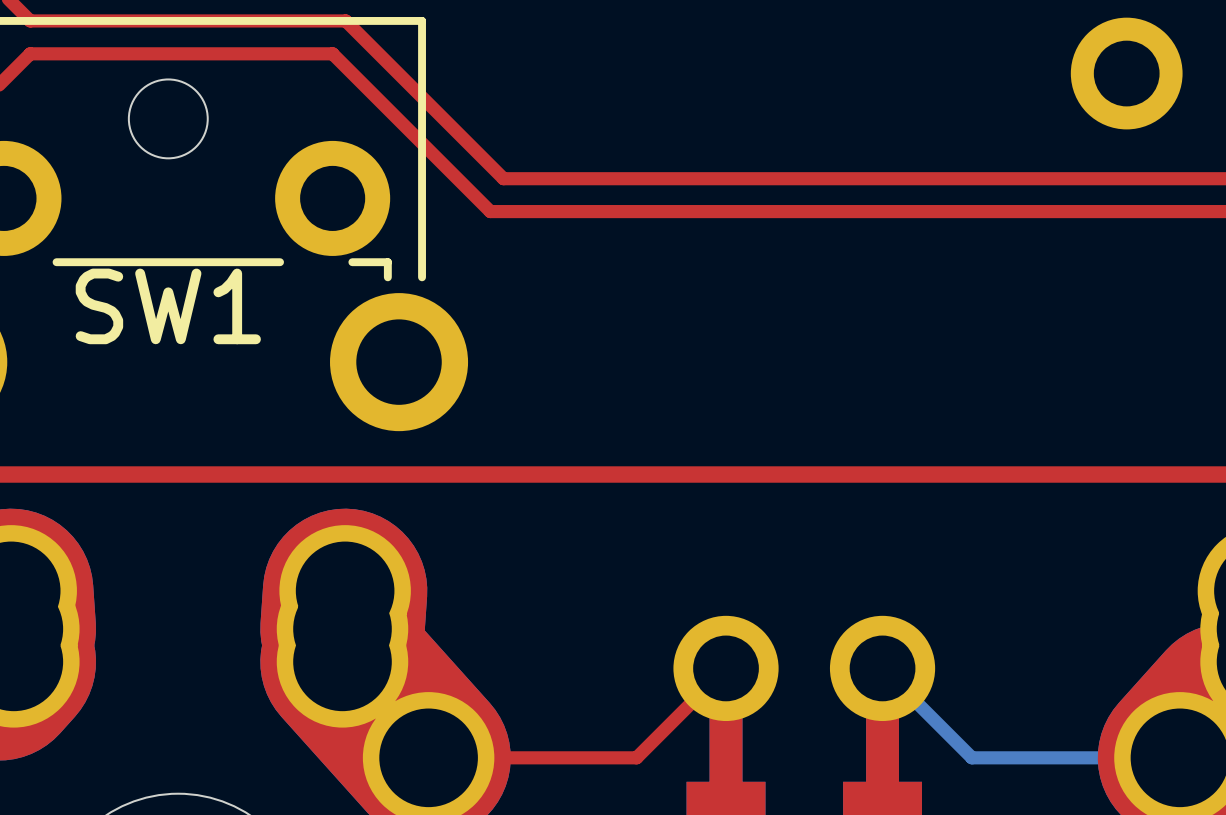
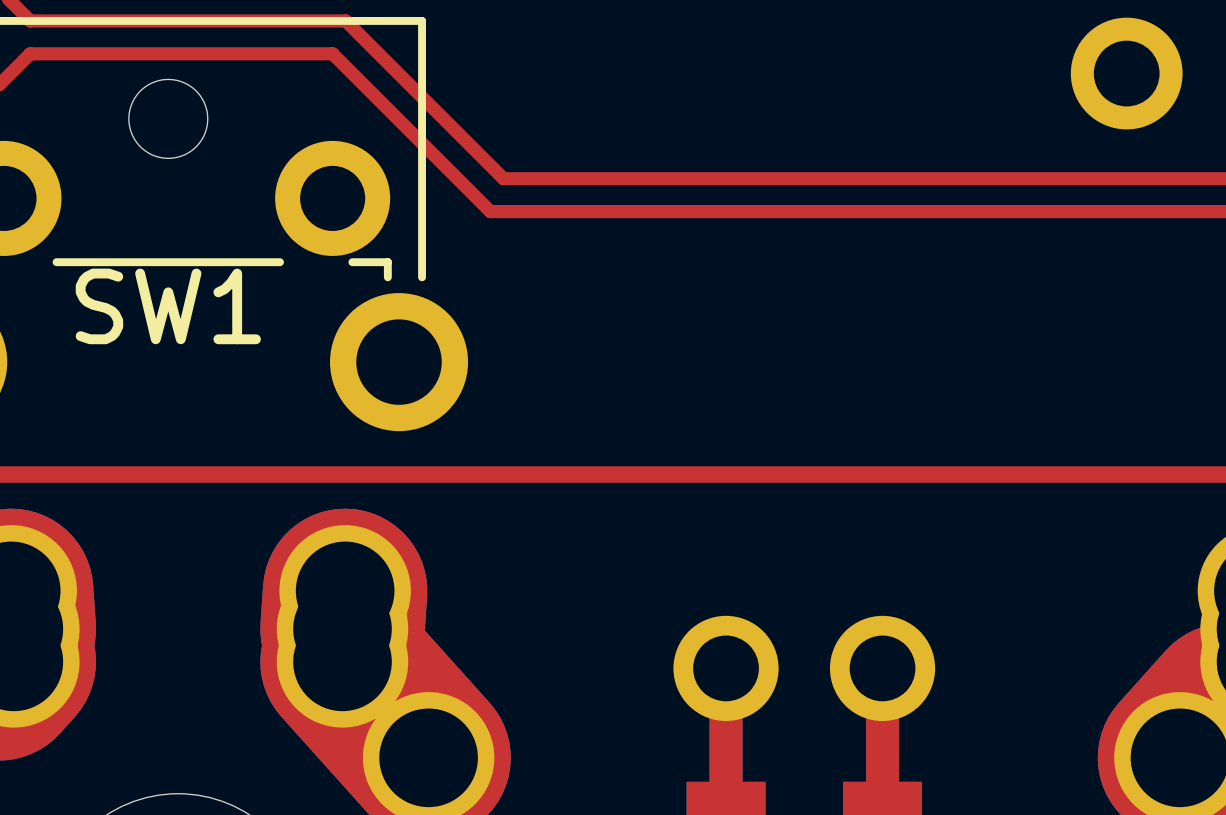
bottom track: (882, 668) (971, 757) (1179, 757) -> none
top track: (726, 747) (726, 668) (636, 757) (428, 757) -> none

